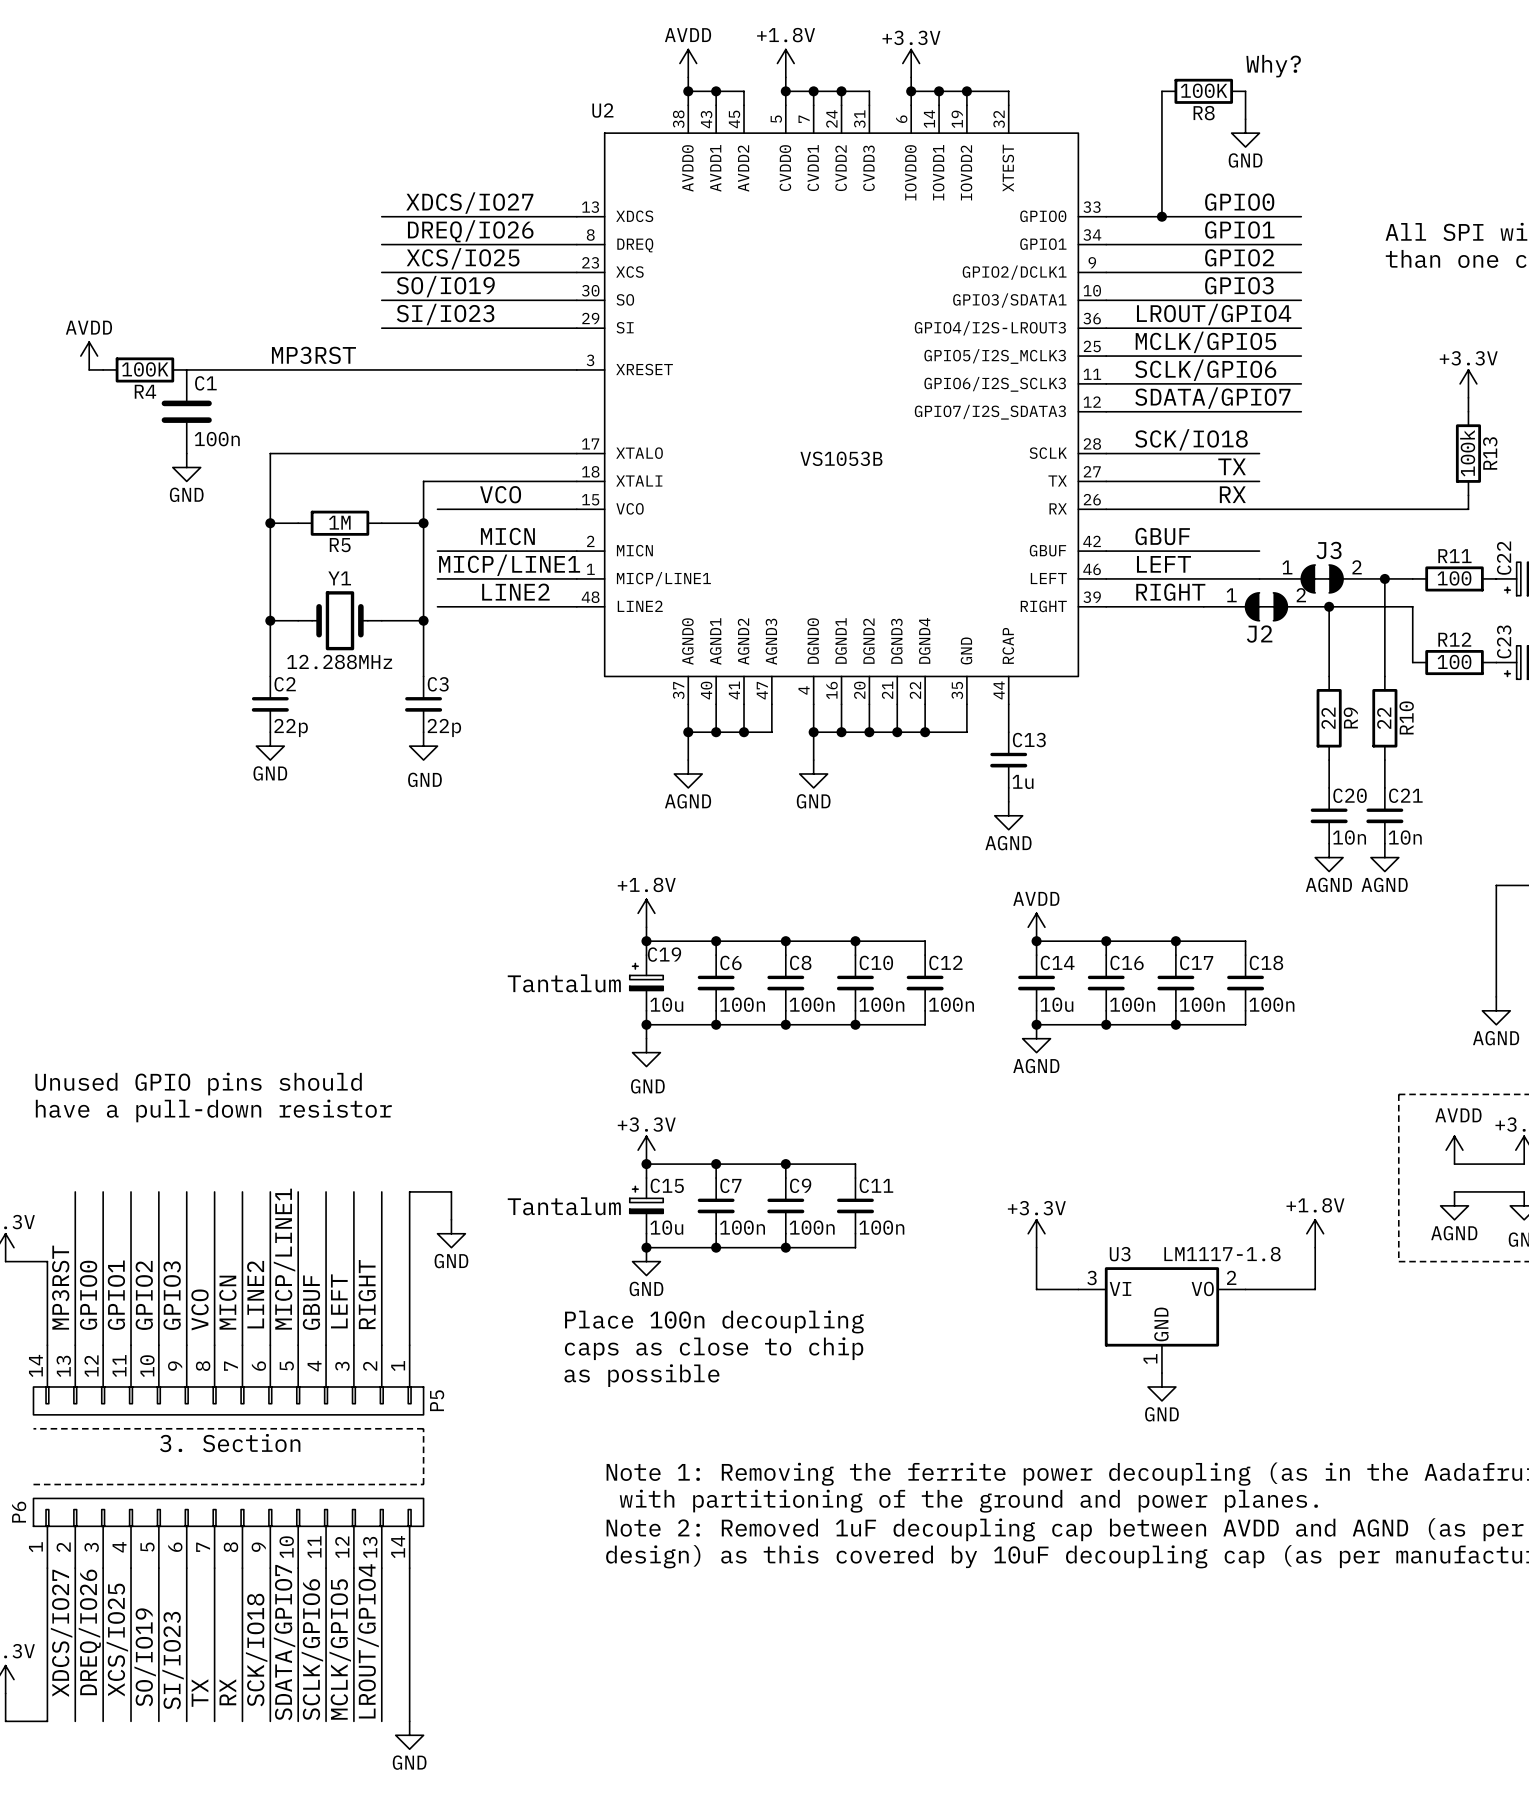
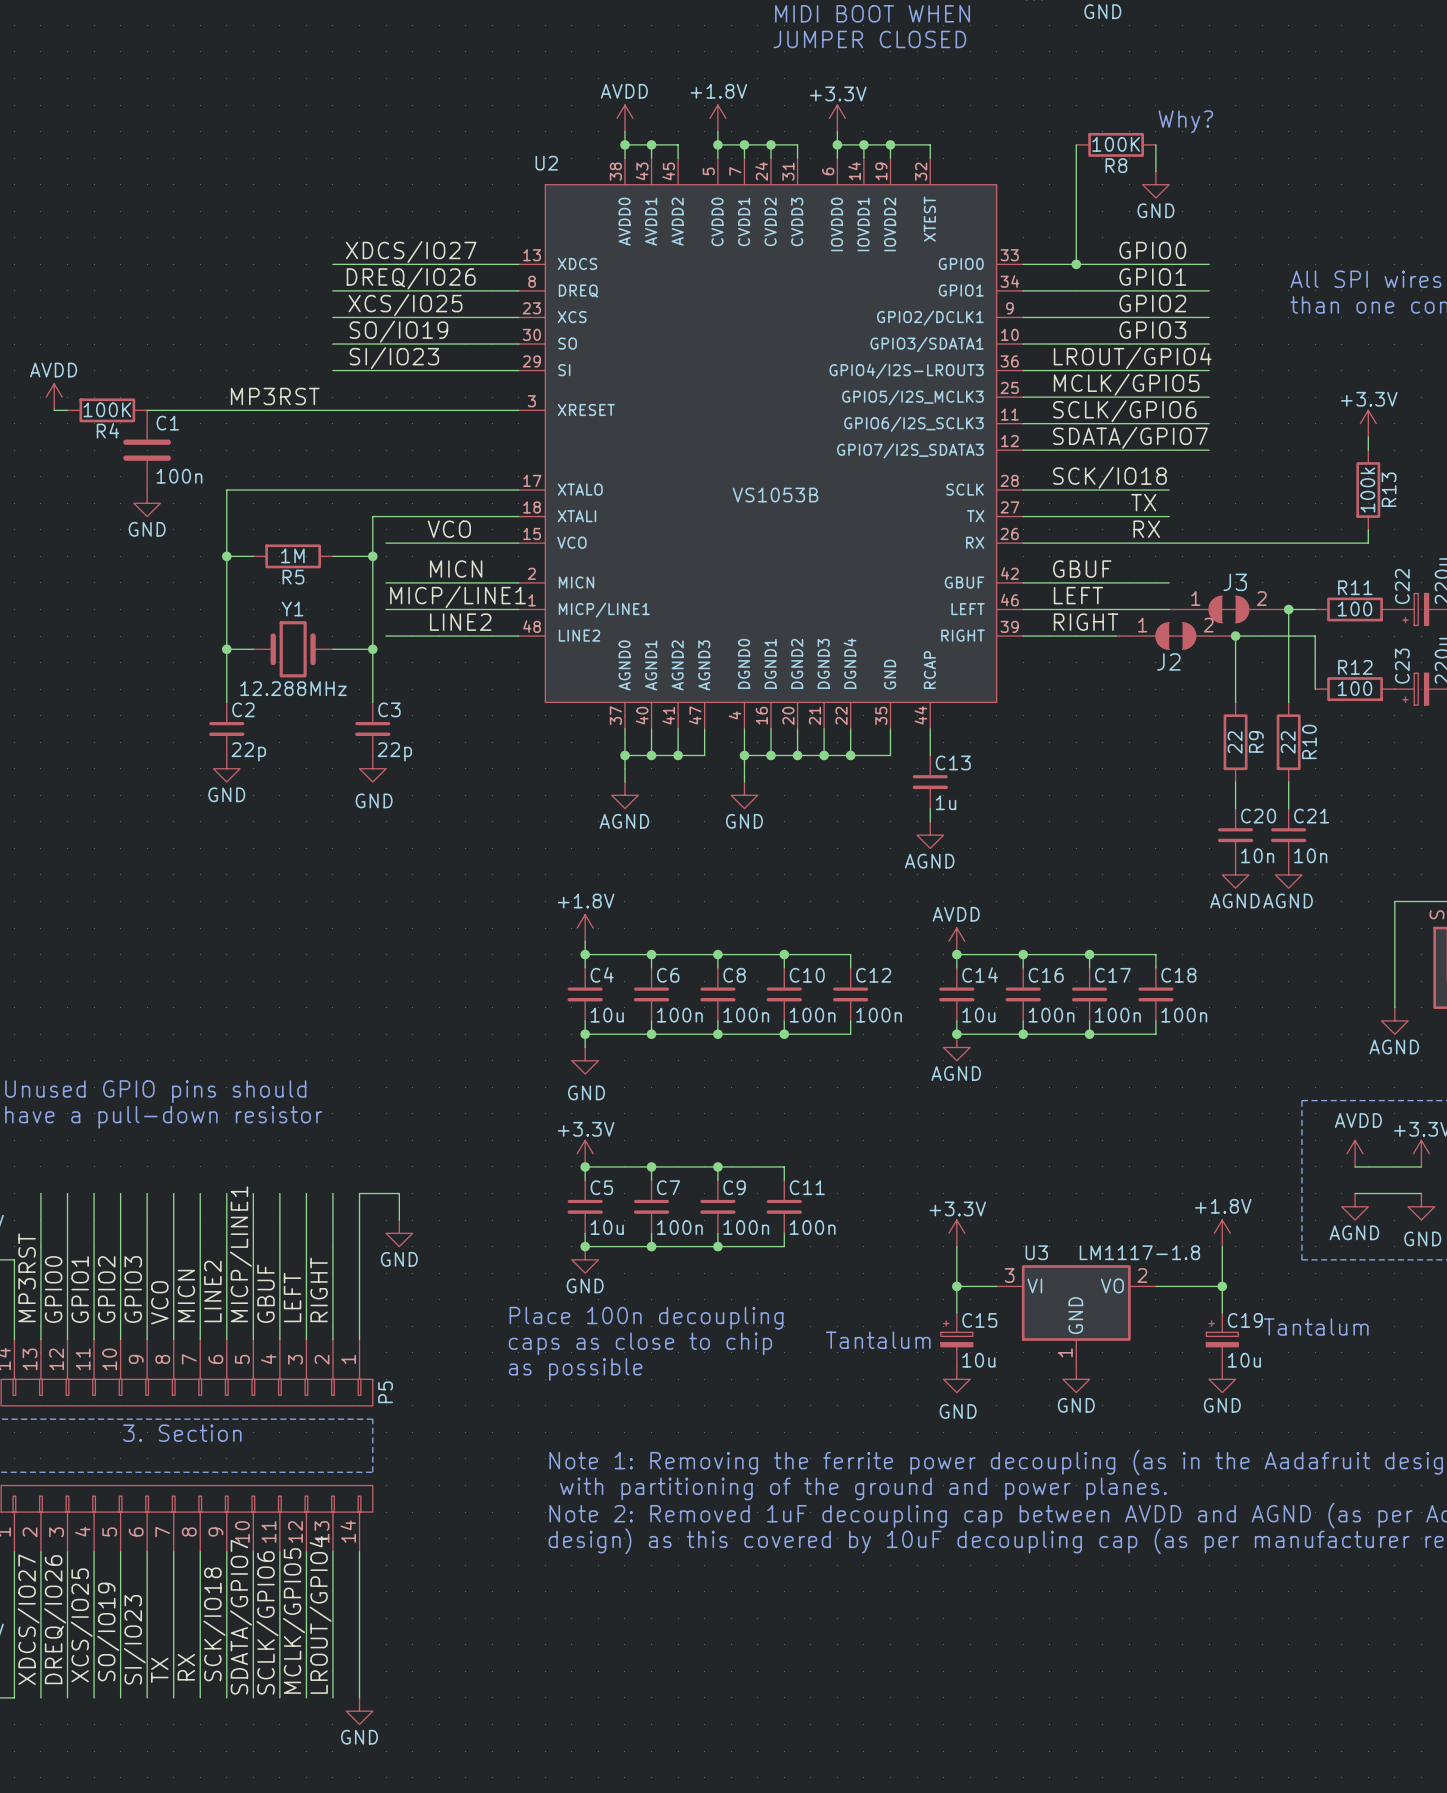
C19 name position: C19 (664, 954) -> C19 (1245, 1320)
C19 position: (646, 982) -> (1222, 1339)
C4: none -> 10u (585, 994)
text: Tantalum (564, 983) -> none
C15 position: (646, 1205) -> (956, 1339)
C5: none -> 10u (585, 1206)
text: Tantalum (564, 1206) -> none
wire: none -> (956, 1286) (956, 1312)
junction: none -> (956, 1286)
wire: none -> (1222, 1286) (1222, 1312)
junction: none -> (1222, 1286)
text: none -> Tantalum (1316, 1326)
text: none -> Tantalum (878, 1340)
power symbol: none -> GND (956, 1379)
power symbol: none -> GND (1222, 1379)

